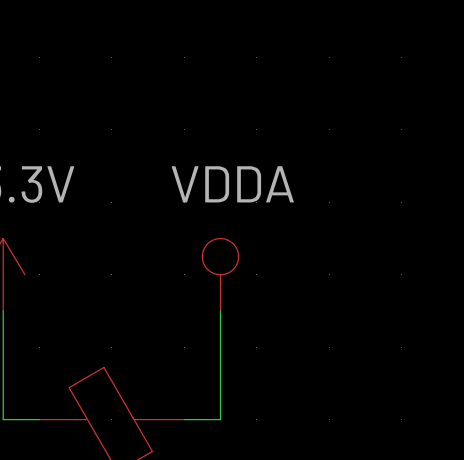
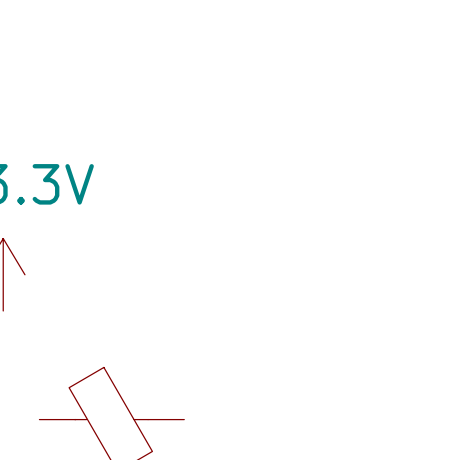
power symbol: VDDA (220, 274) -> none
wire: (3, 310) (3, 419) (39, 419) -> none
wire: (220, 310) (220, 419) (184, 419) -> none

